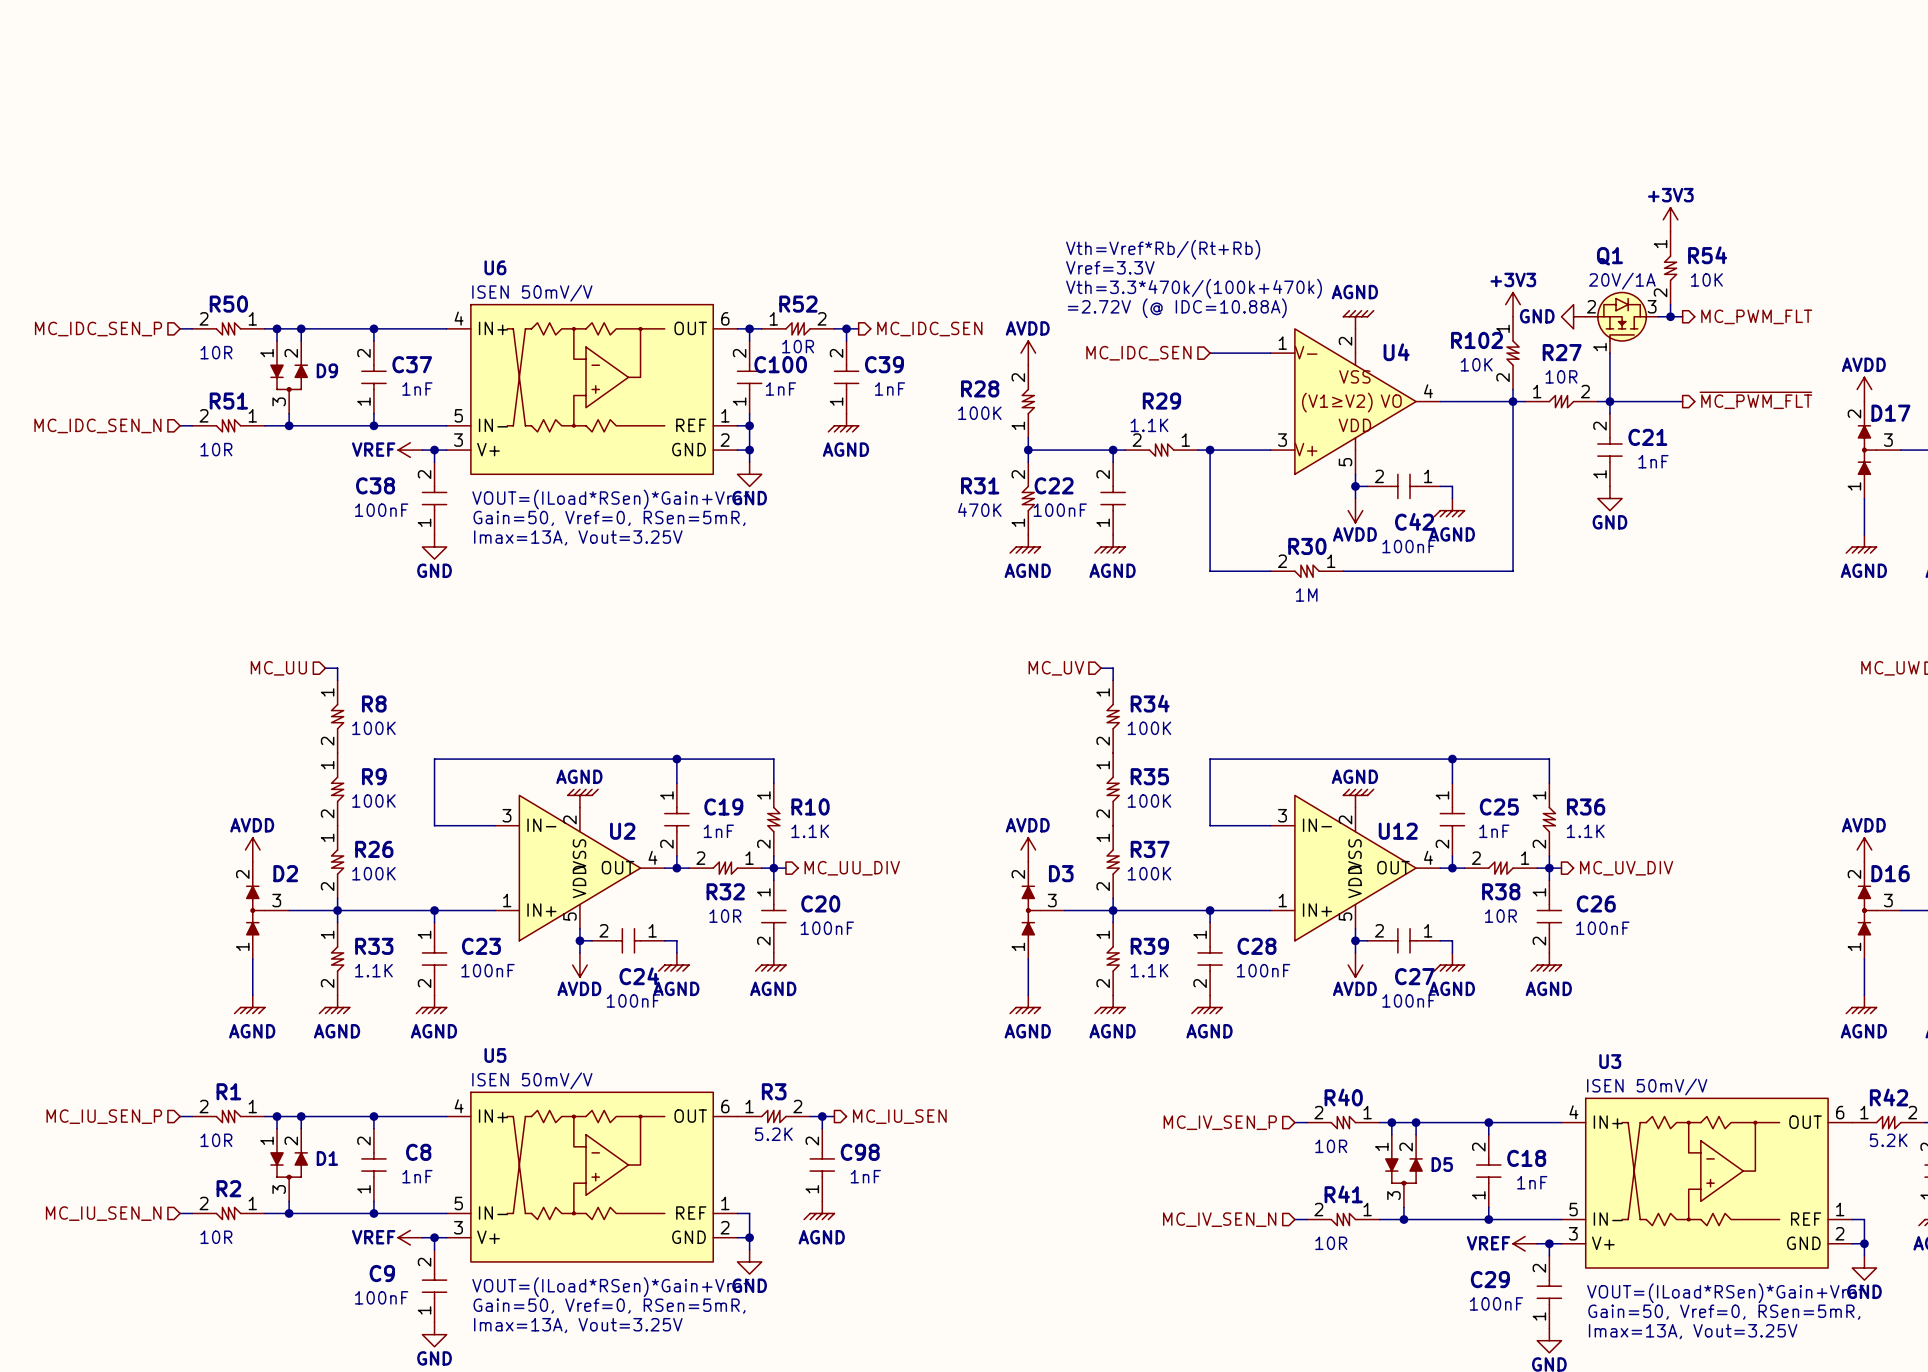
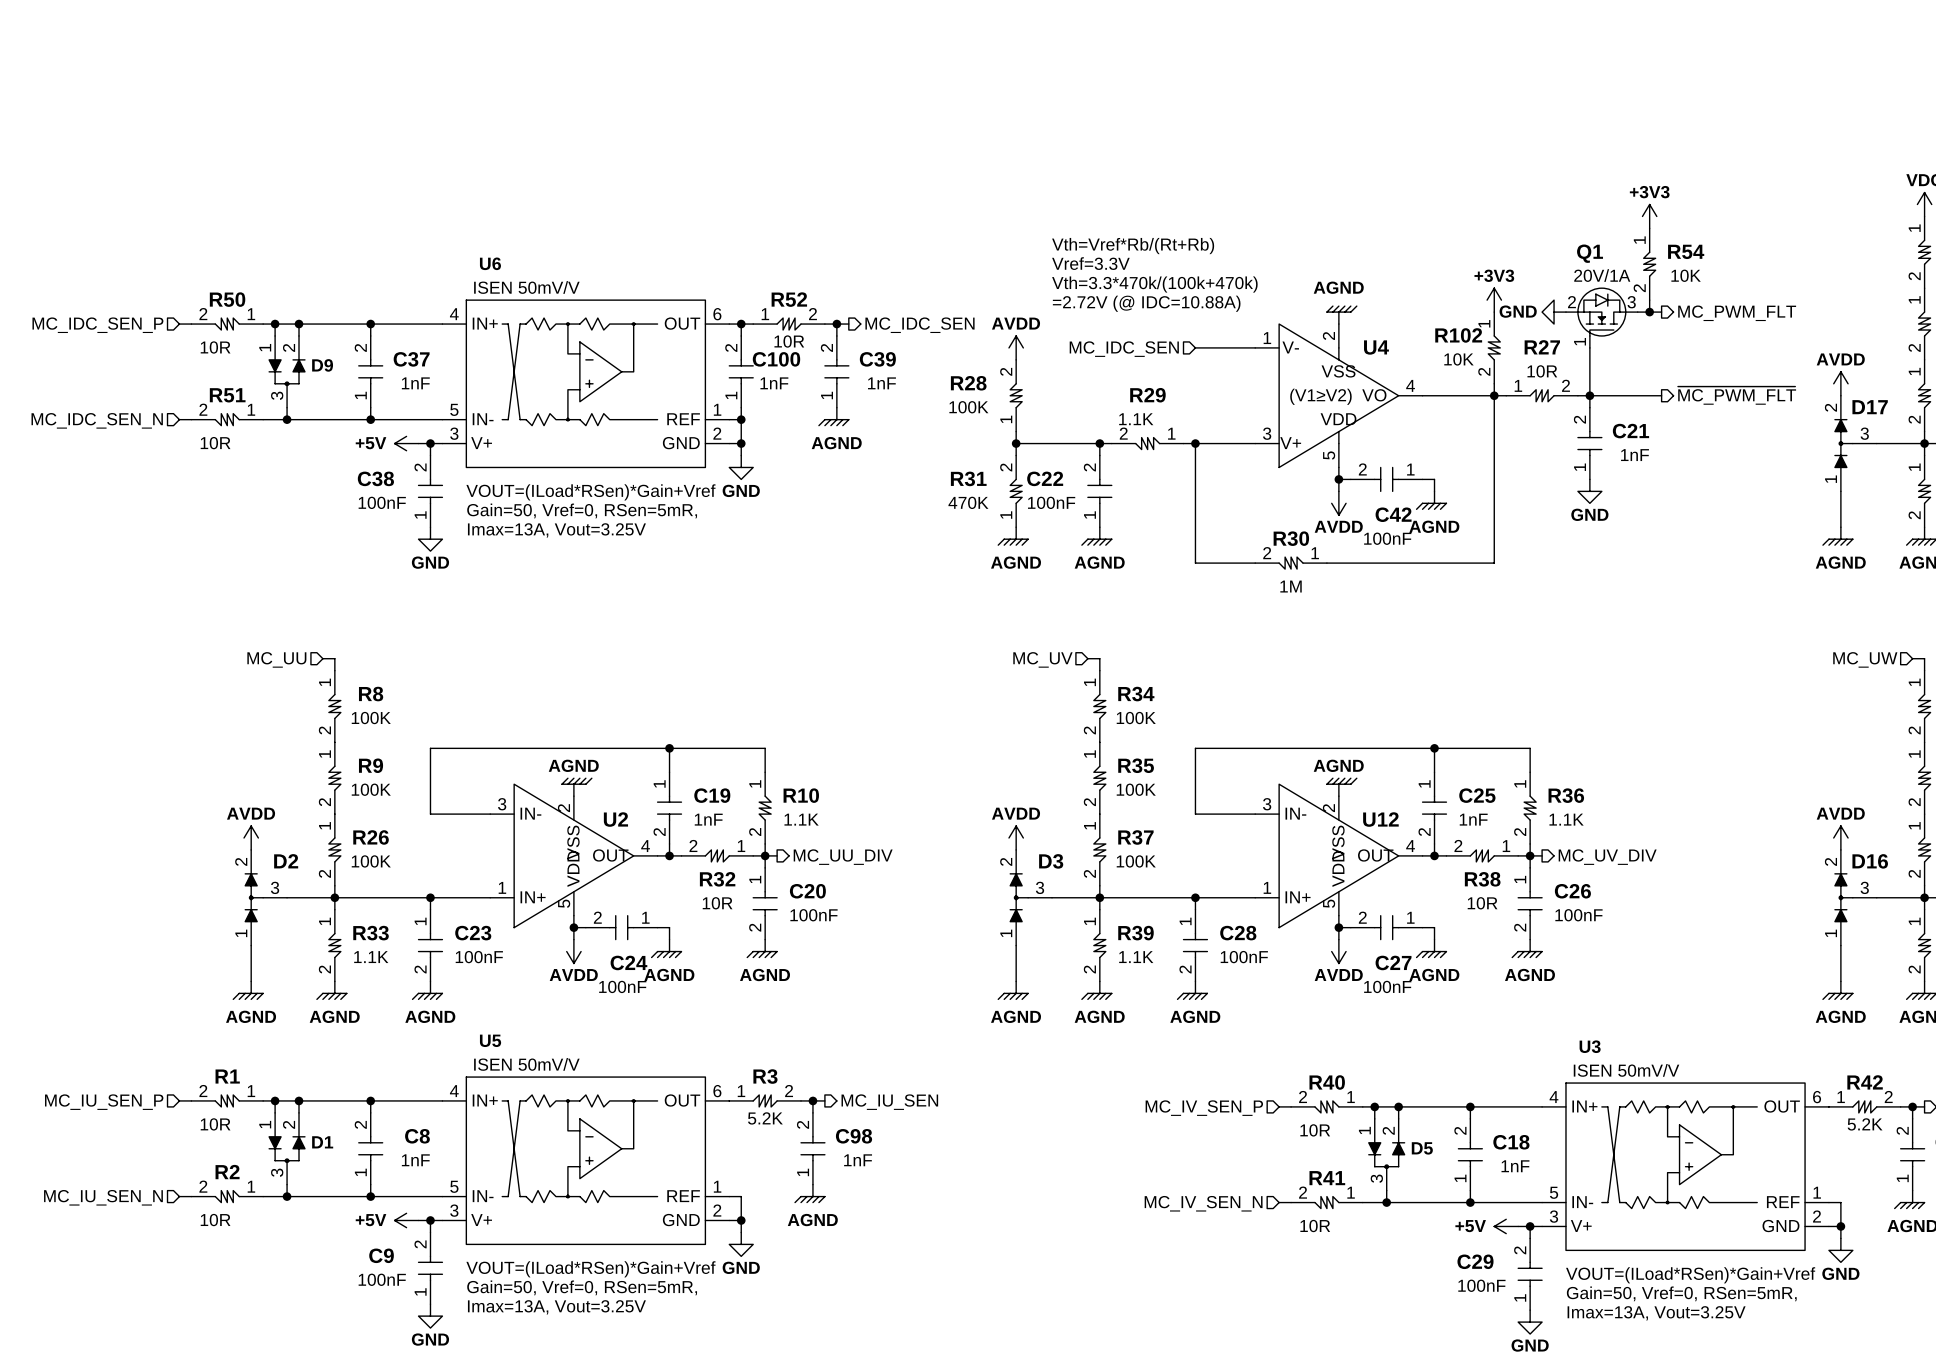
power symbol: VREF (410, 450) -> +5V (406, 443)
power symbol: VREF (410, 1237) -> +5V (406, 1220)
power symbol: VREF (1525, 1243) -> +5V (1506, 1226)

